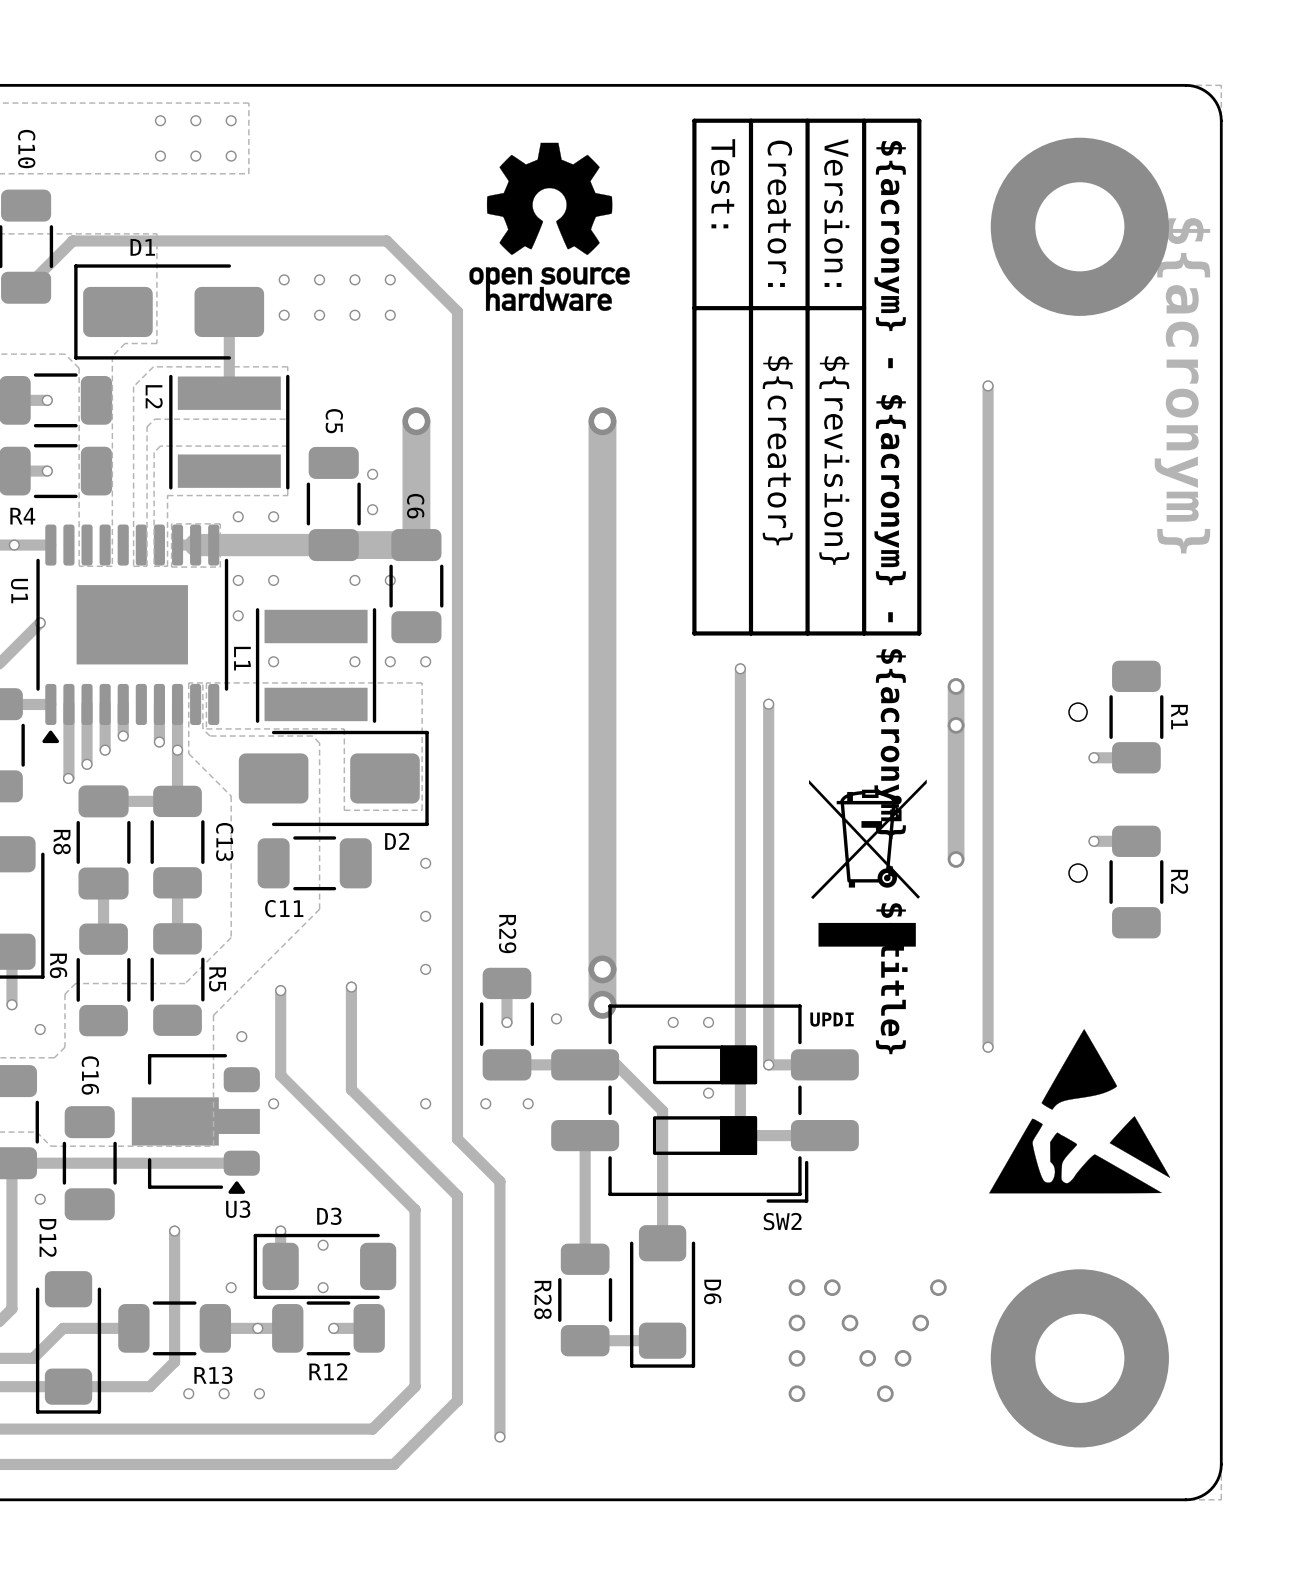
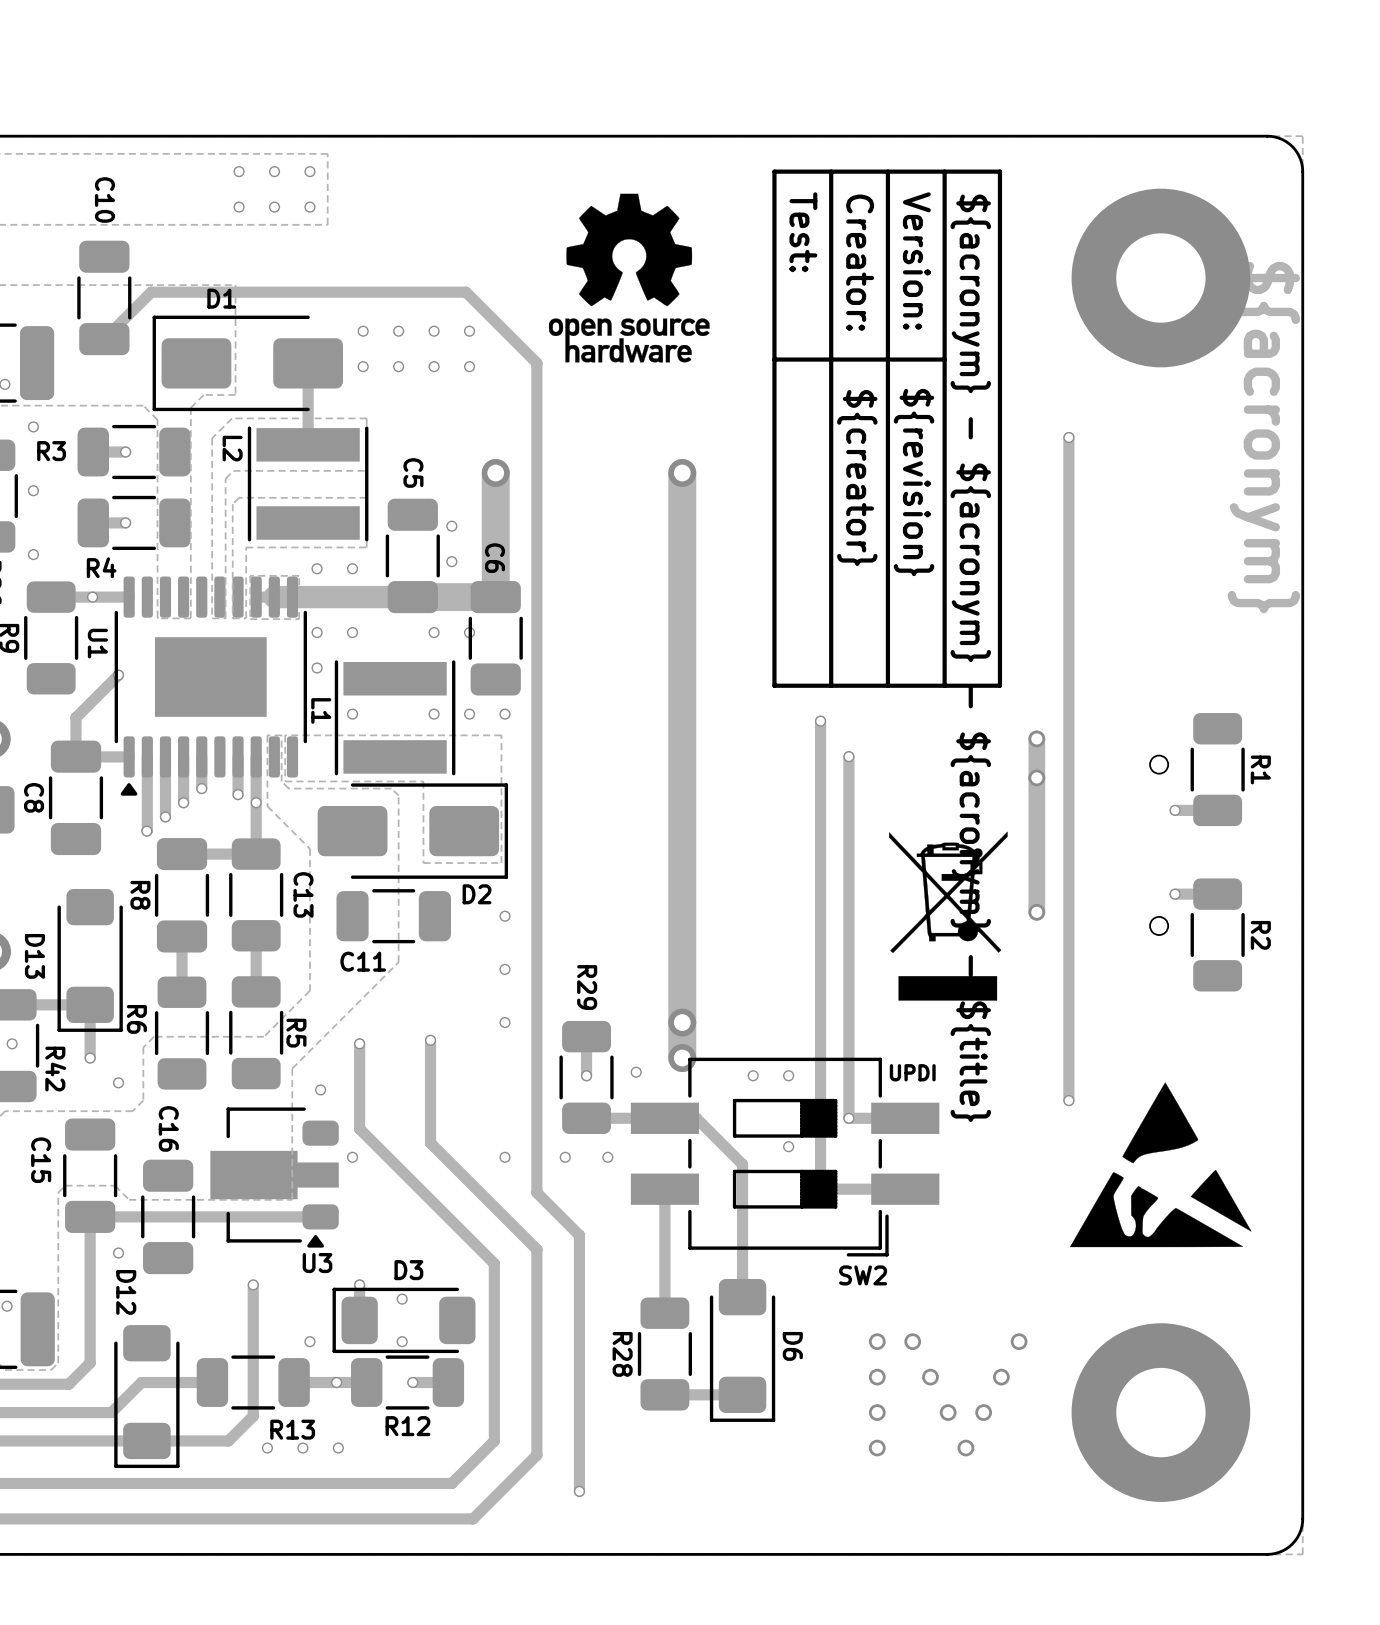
drawing shape: [809, 779, 927, 947] -> [889, 831, 1008, 1001]
SW2 footprint: [551, 1004, 859, 1203] -> [630, 1057, 940, 1257]

